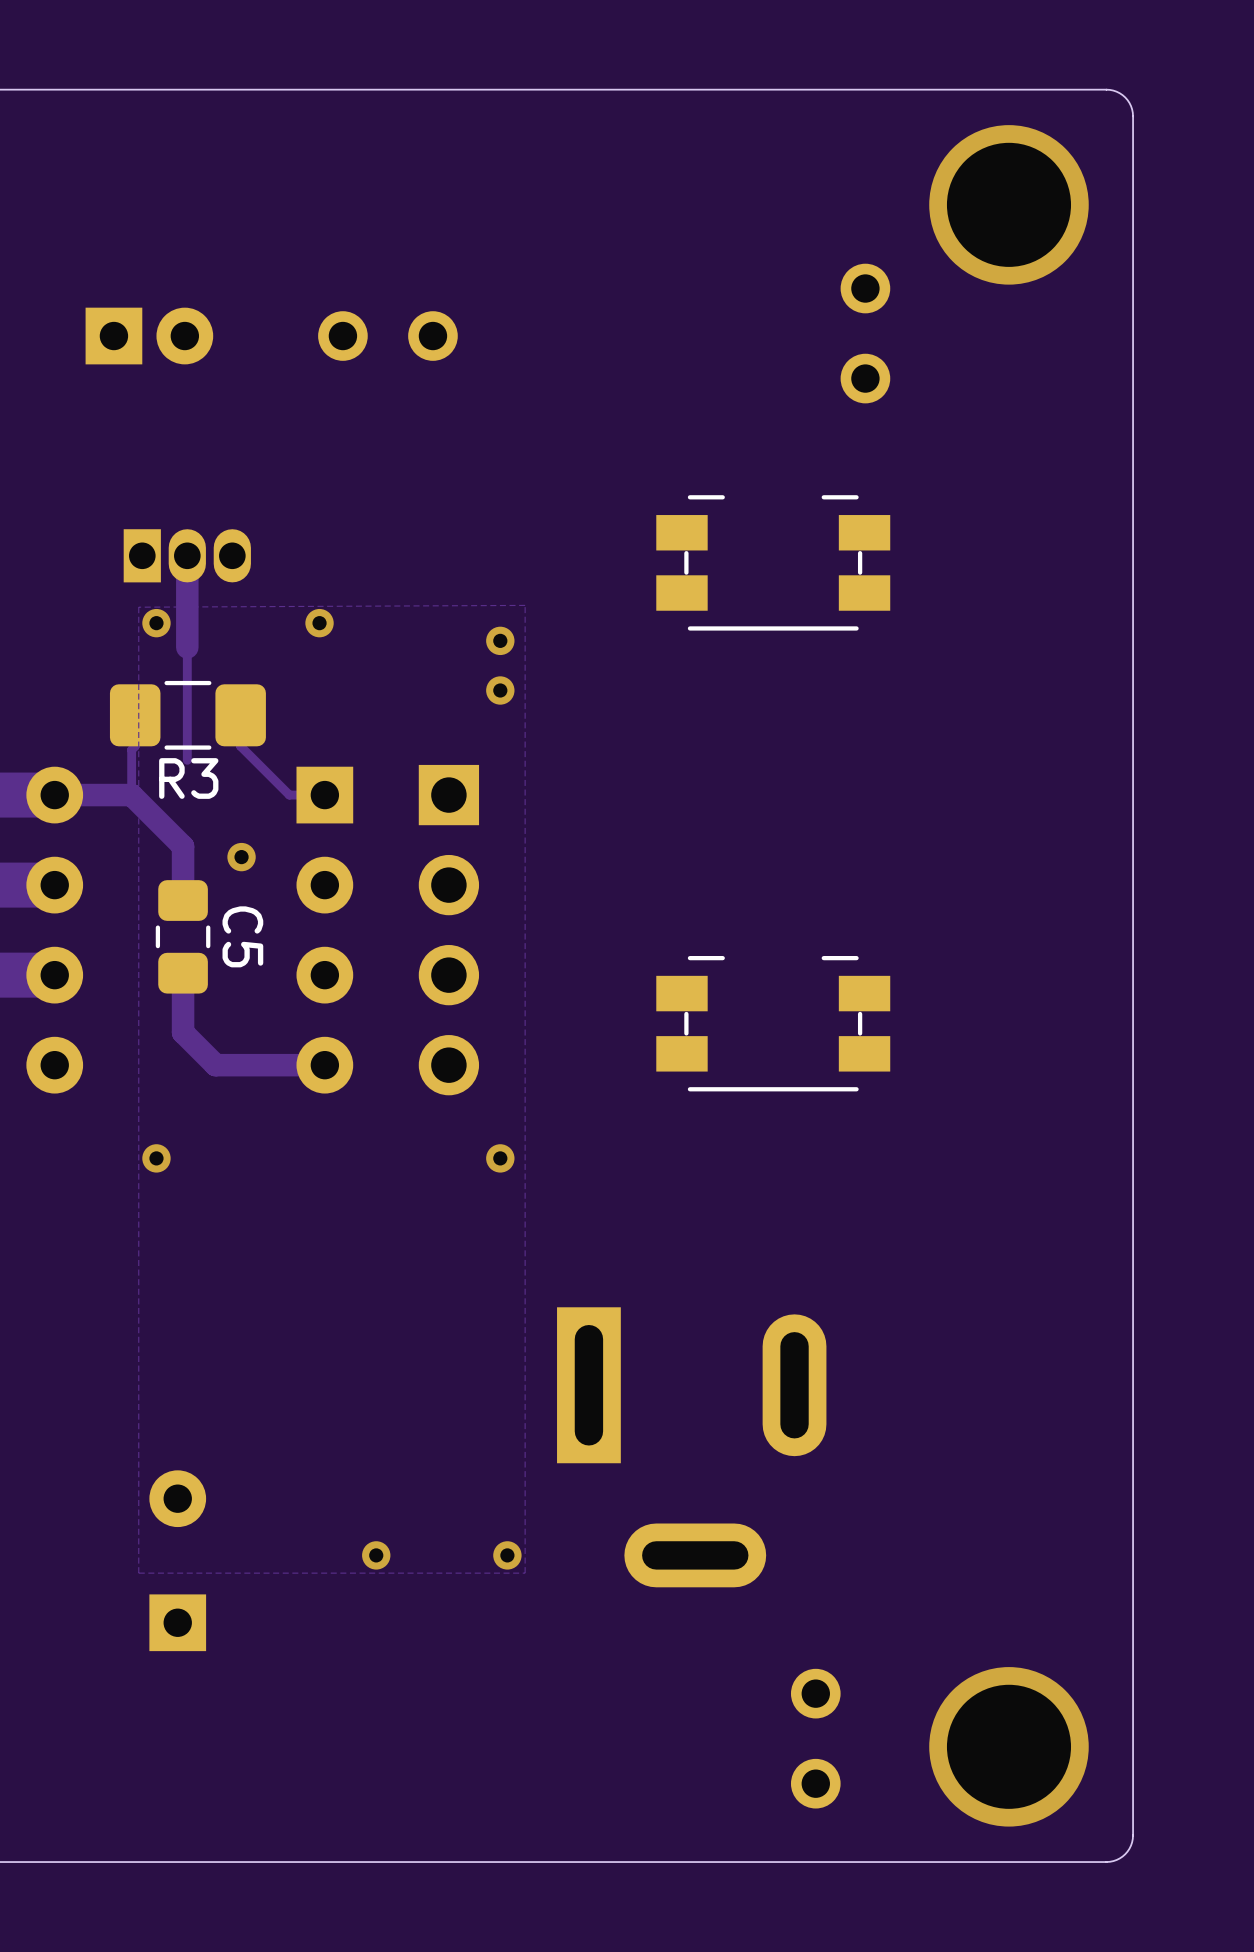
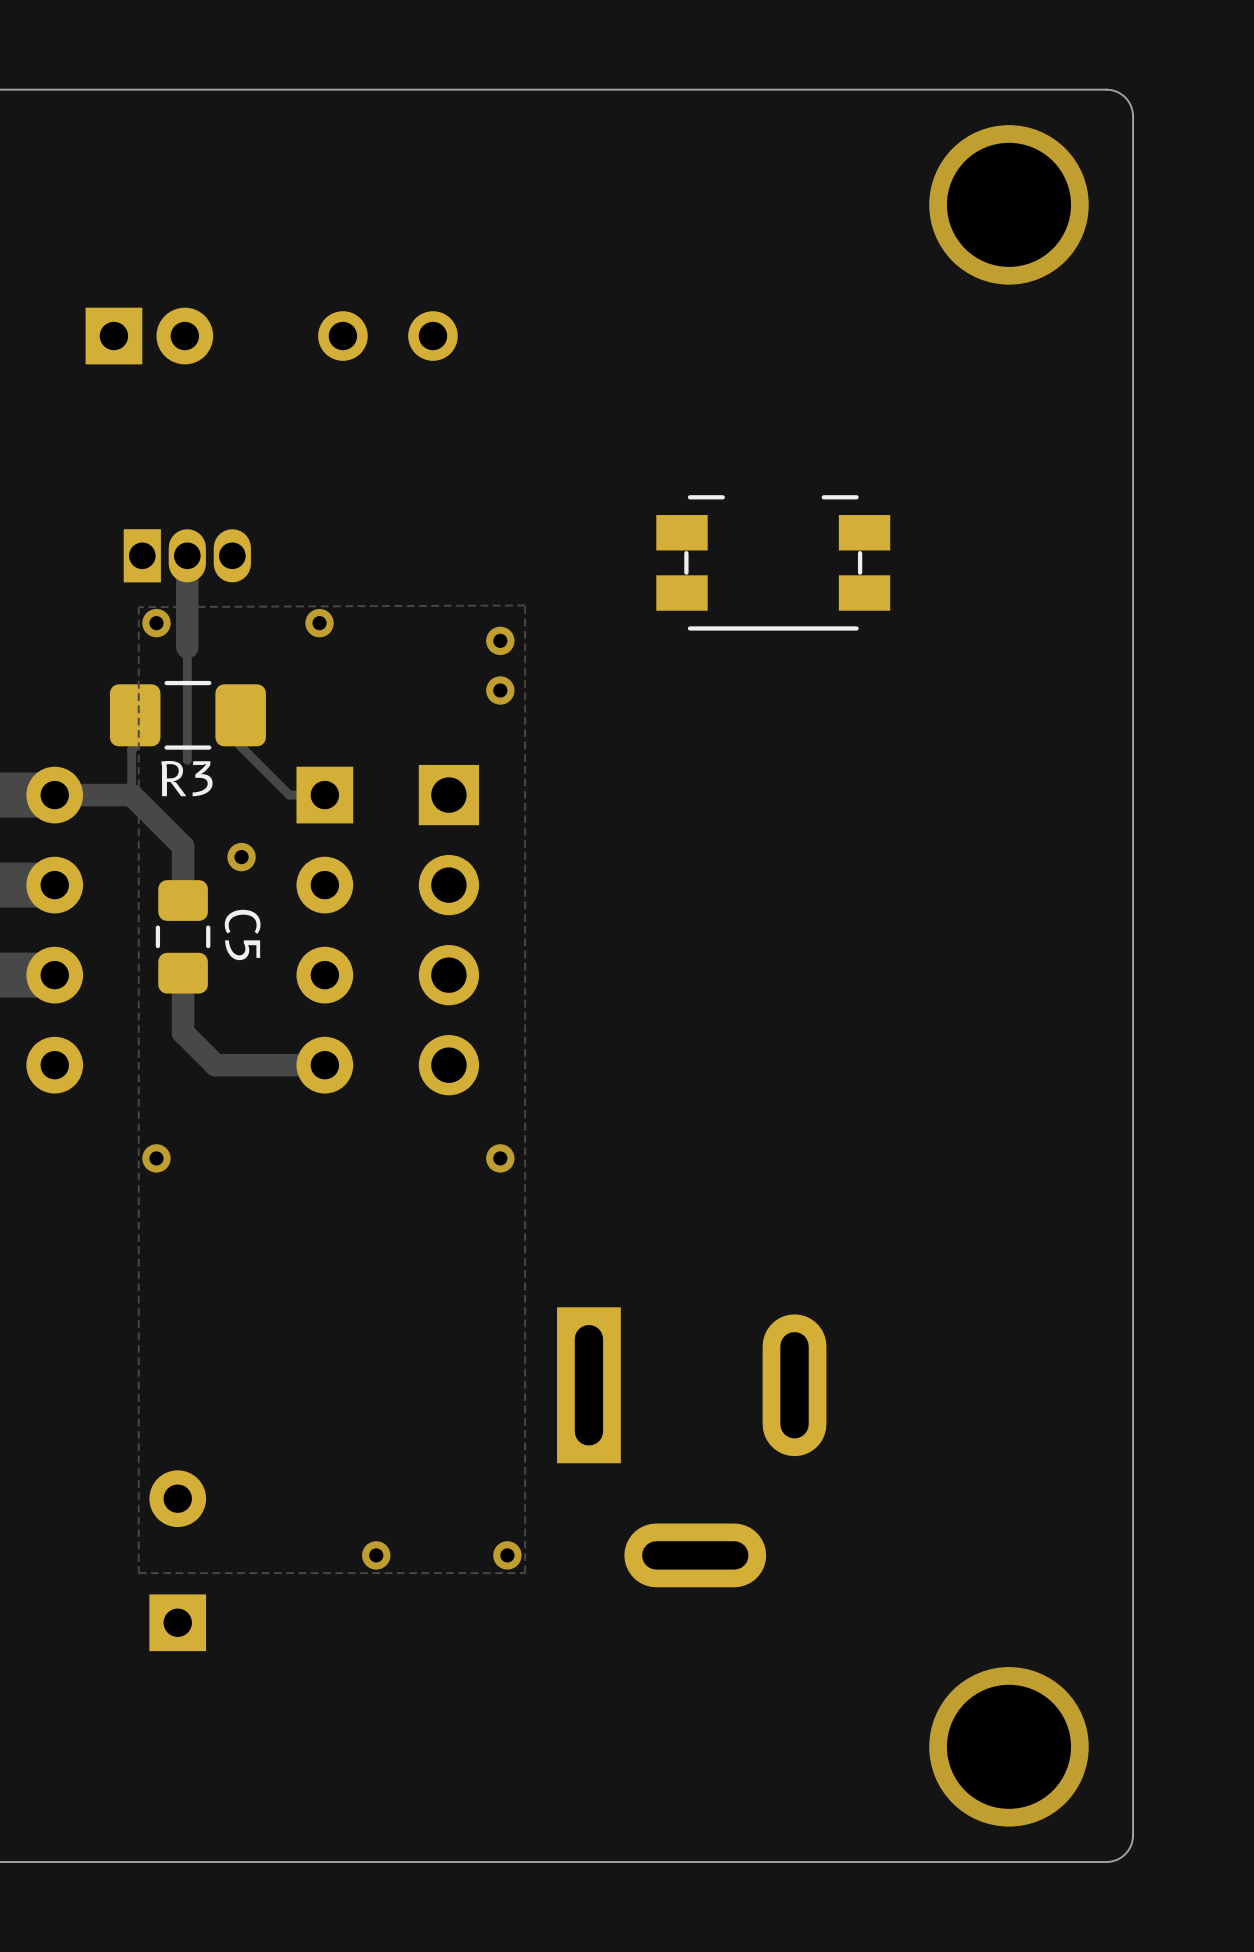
part: (865, 333) -> none
part: (773, 1023) -> none
part: (815, 1738) -> none

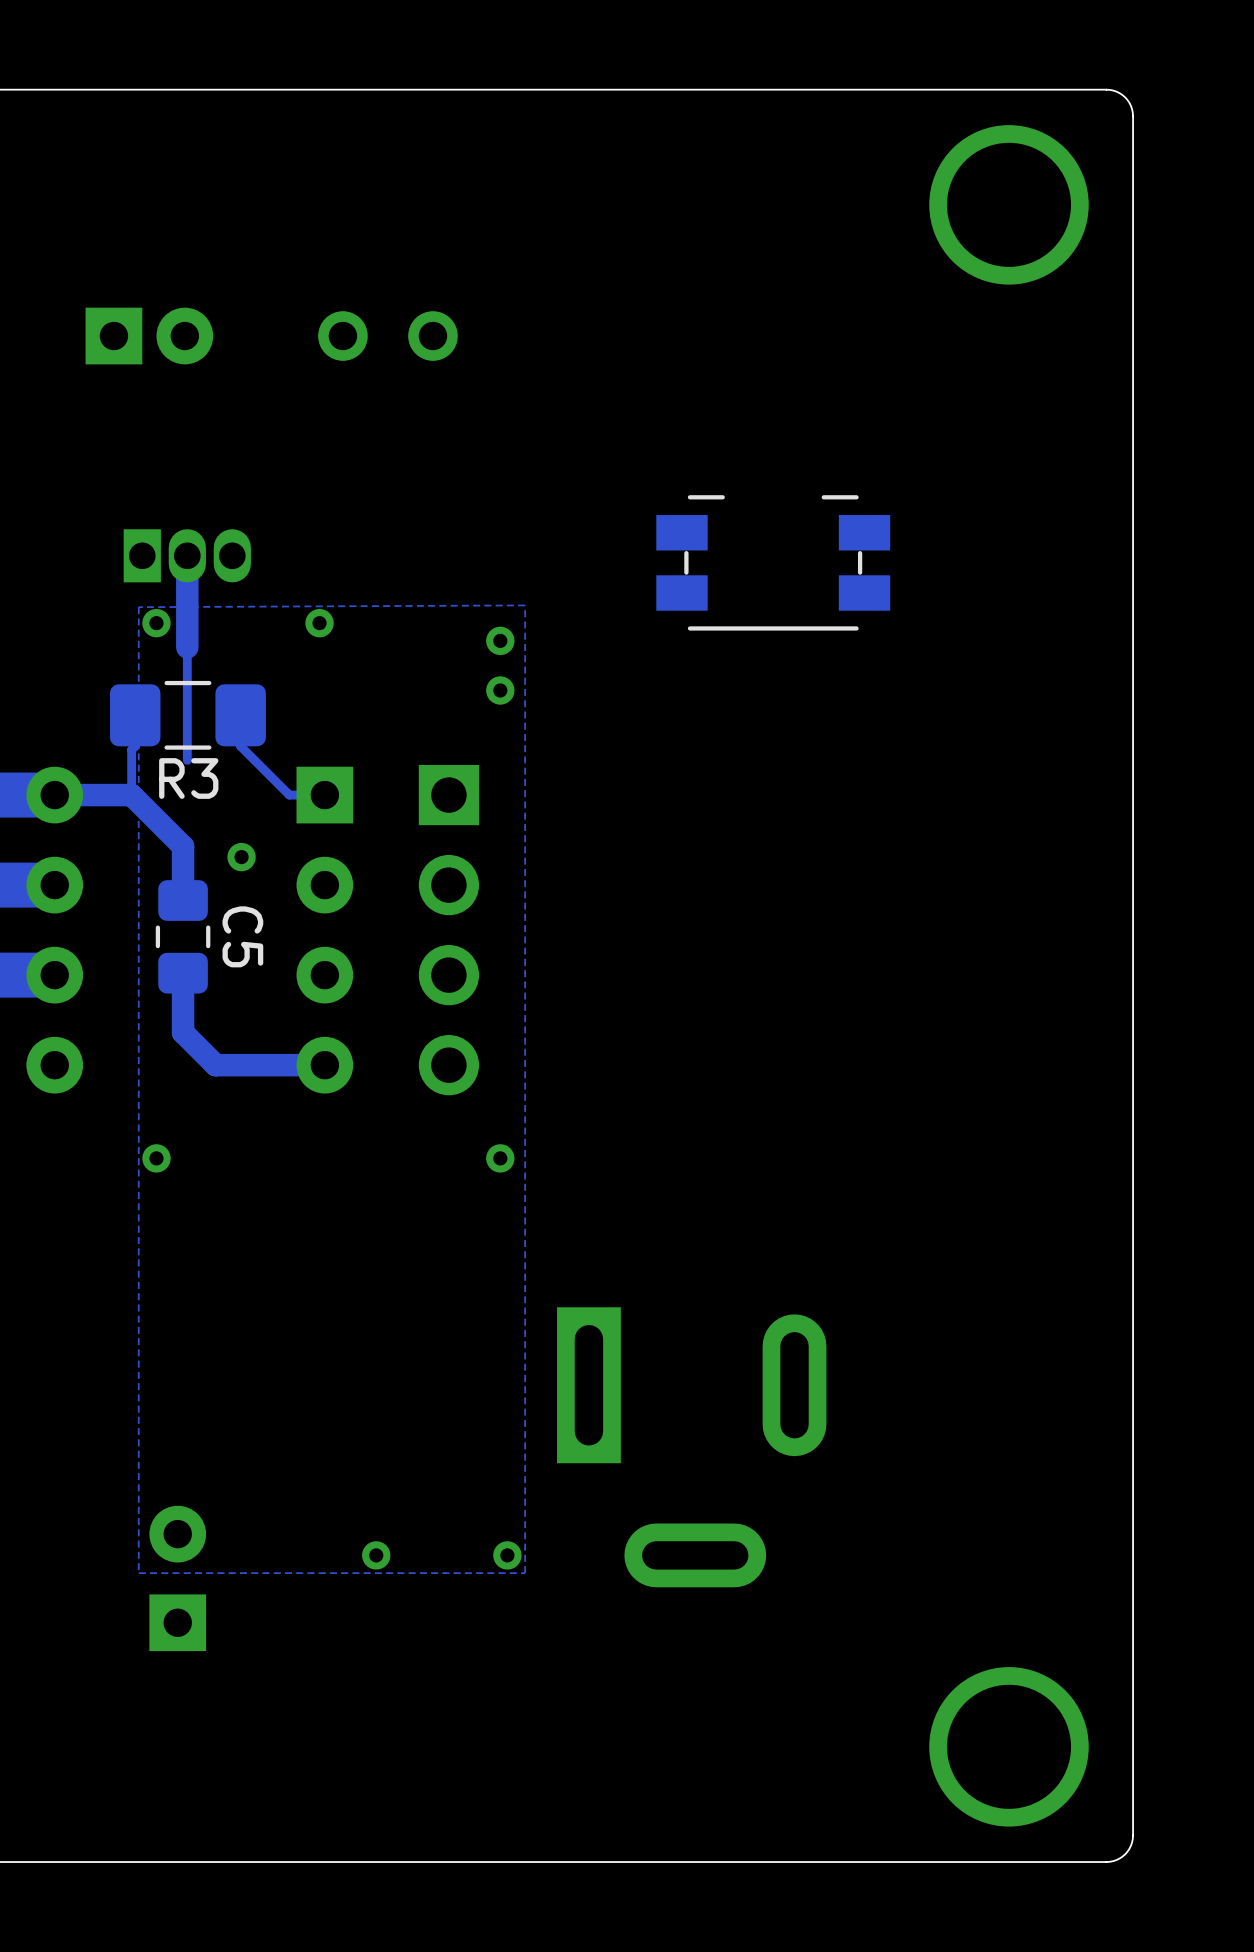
part footprint: [149, 1470, 207, 1652] -> [149, 1505, 207, 1652]

